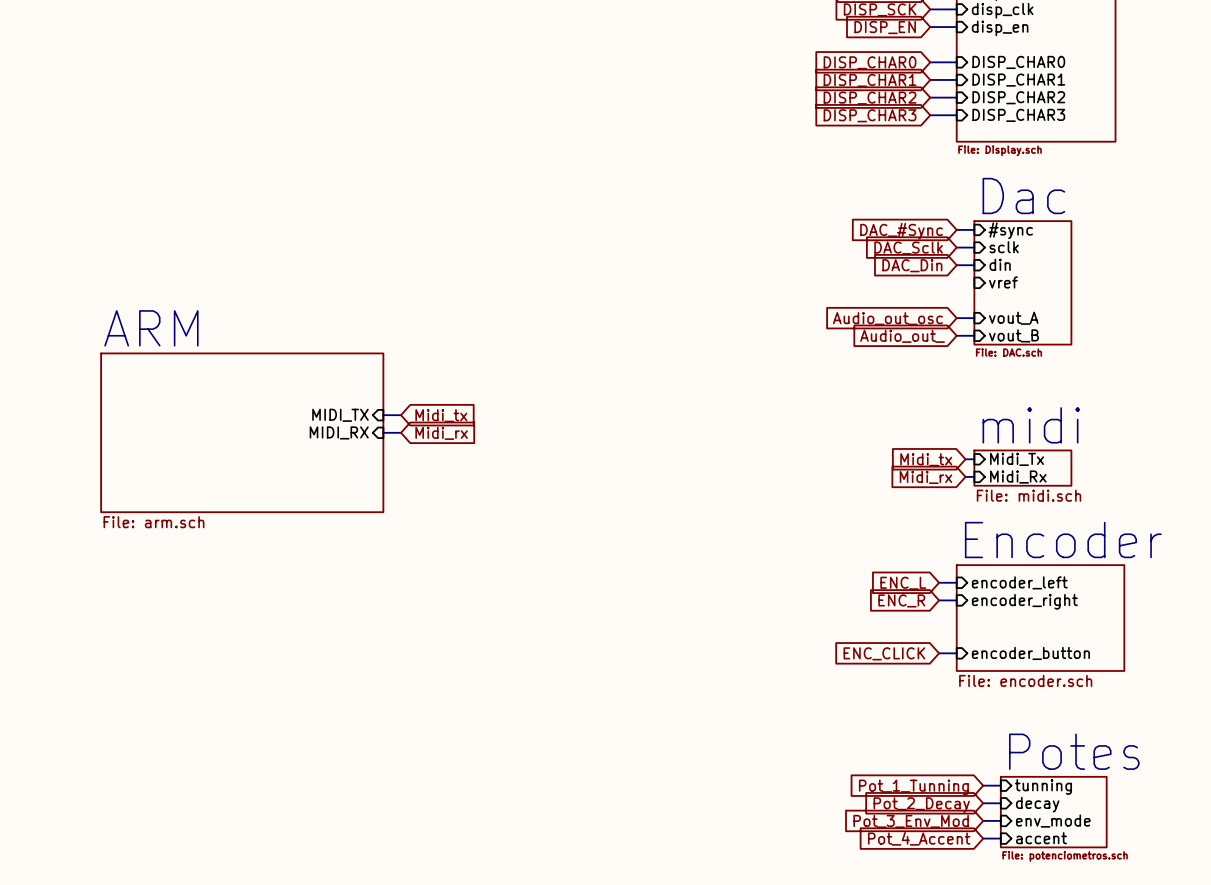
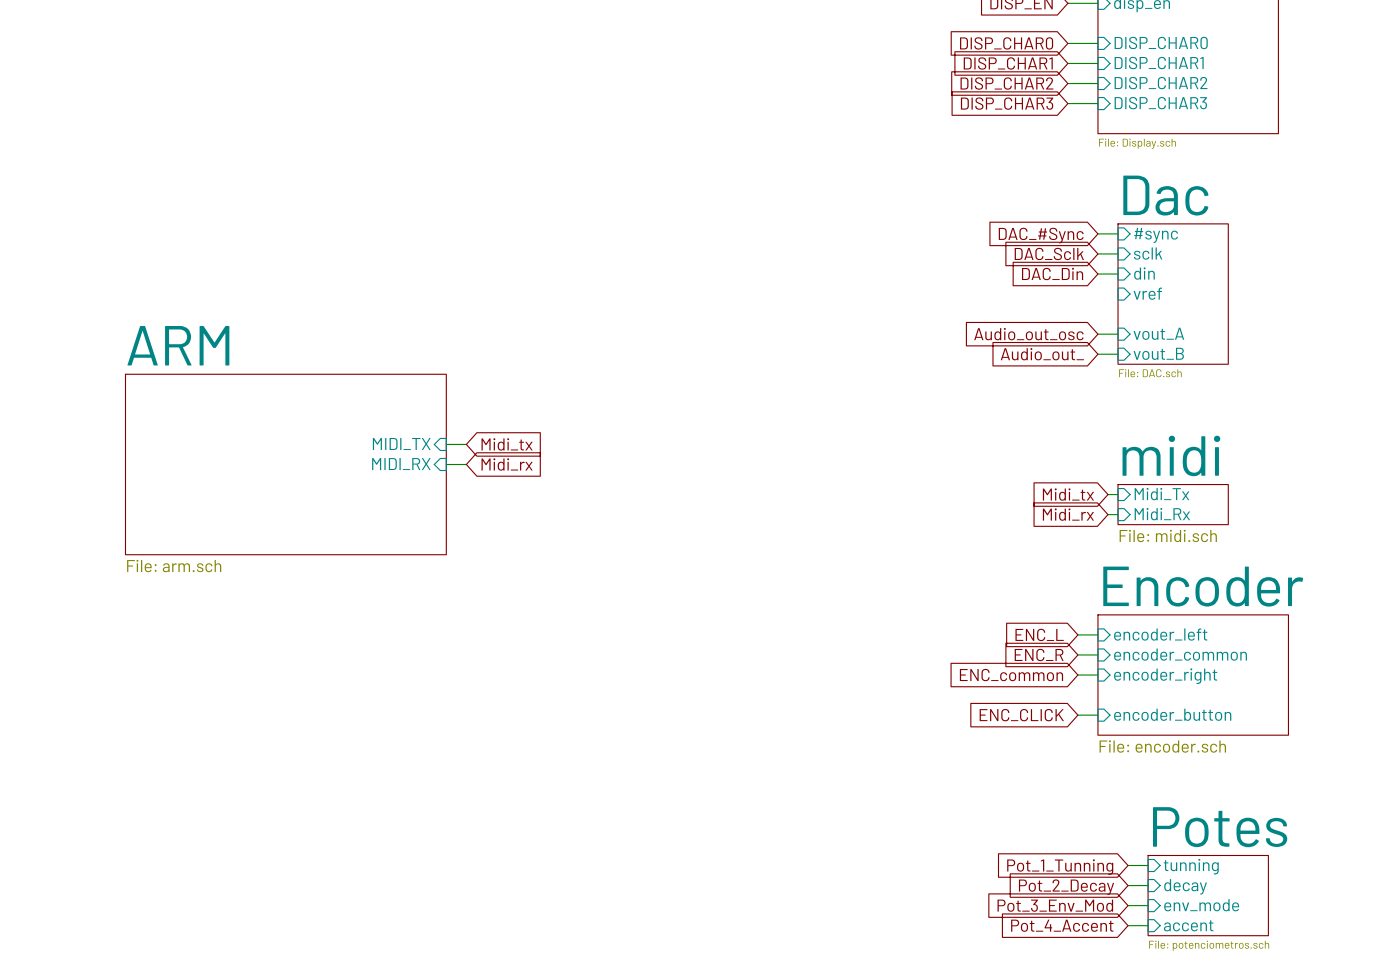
sheet pin: encoder_right (1024, 601) -> encoder_common (1180, 654)
global label: none -> ENC_common (1011, 675)
wire: none -> (1077, 675) (1097, 675)
sheet pin: none -> encoder_right (1165, 676)

